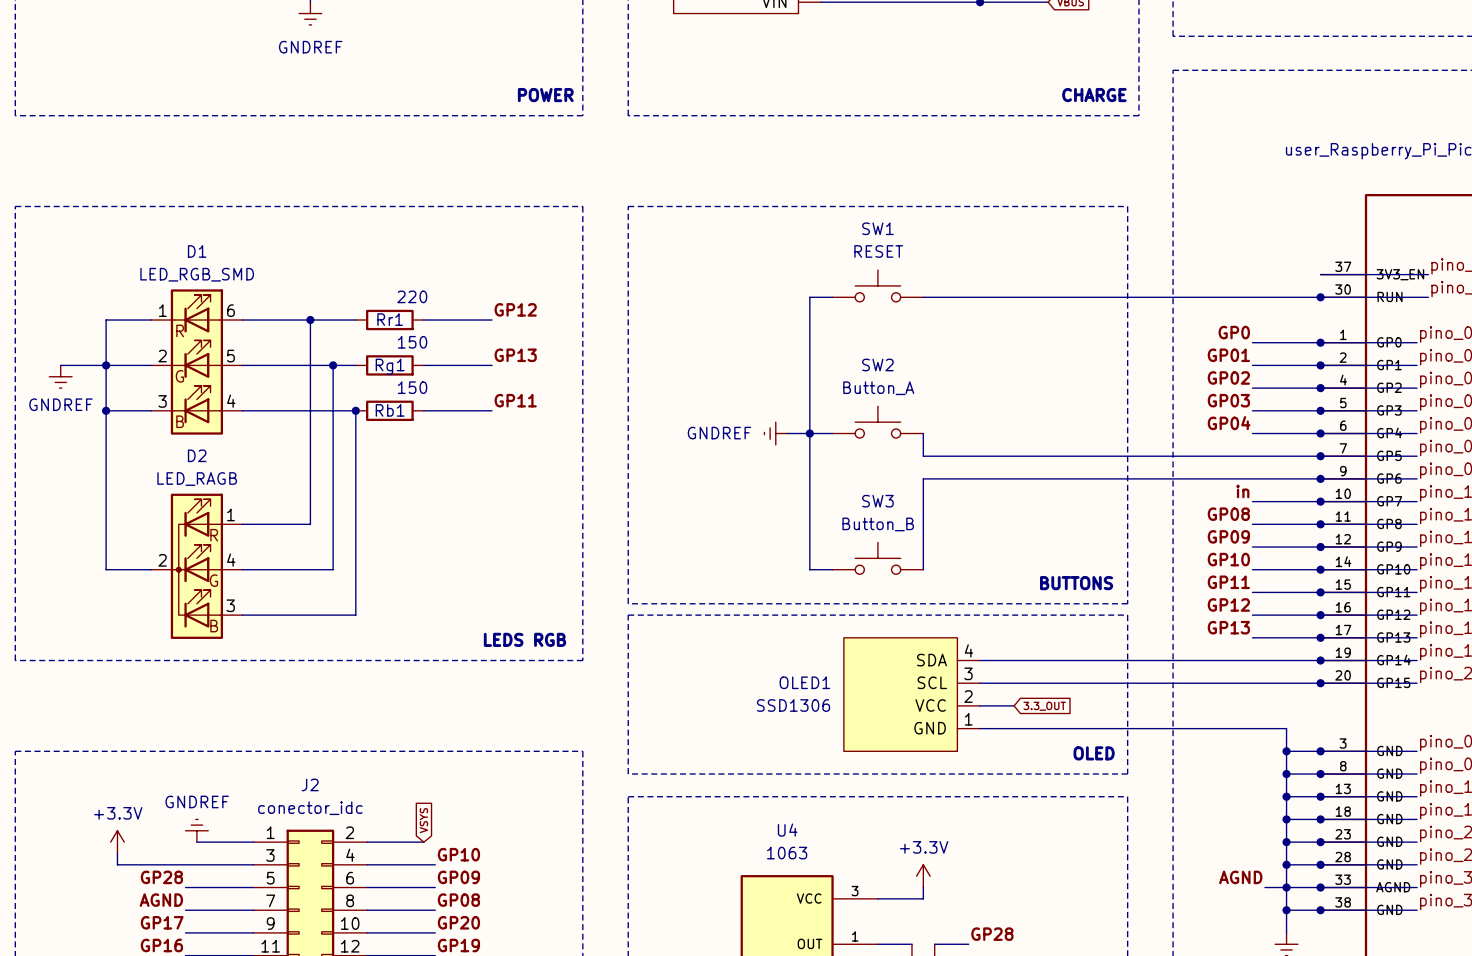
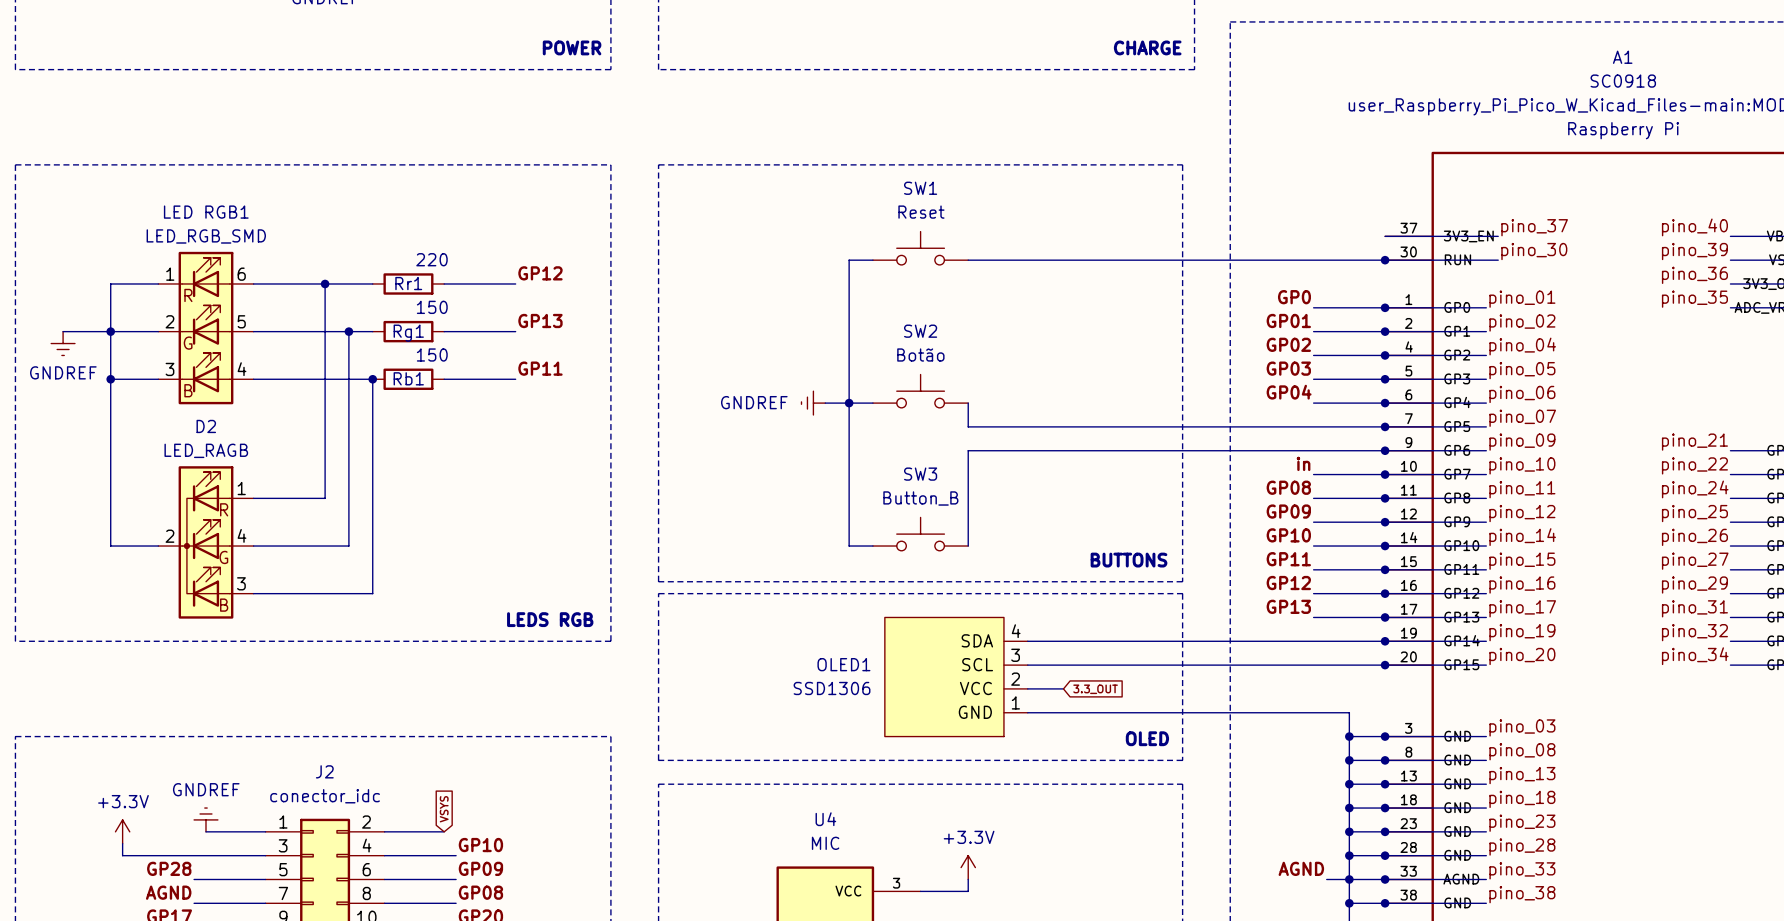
D1 name: D1 (197, 251) -> LED RGB1 (206, 212)
SW1 value: RESET (878, 251) -> Reset (921, 212)
SW2 value: Button_A (878, 388) -> Botão (920, 355)
U4 value: 1063 (787, 853) -> MIC (825, 843)

